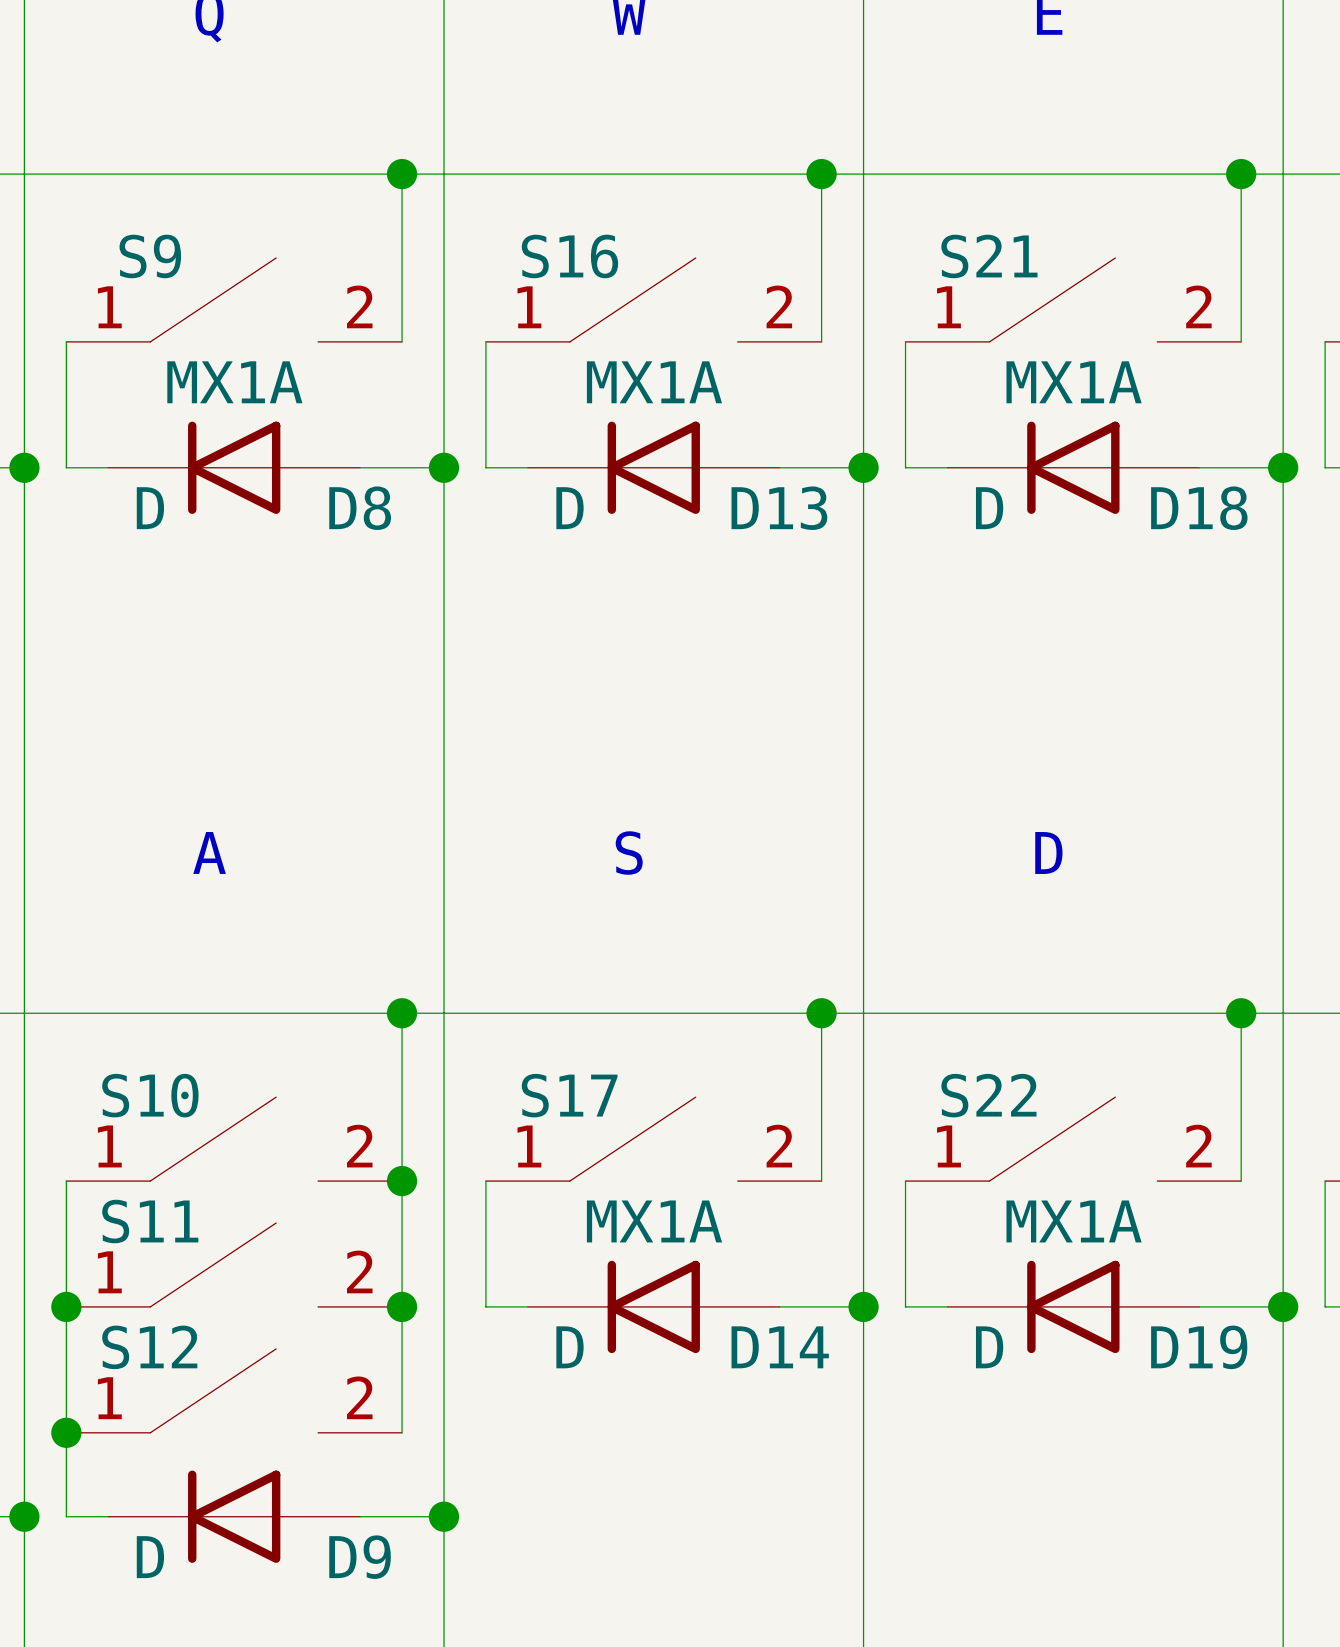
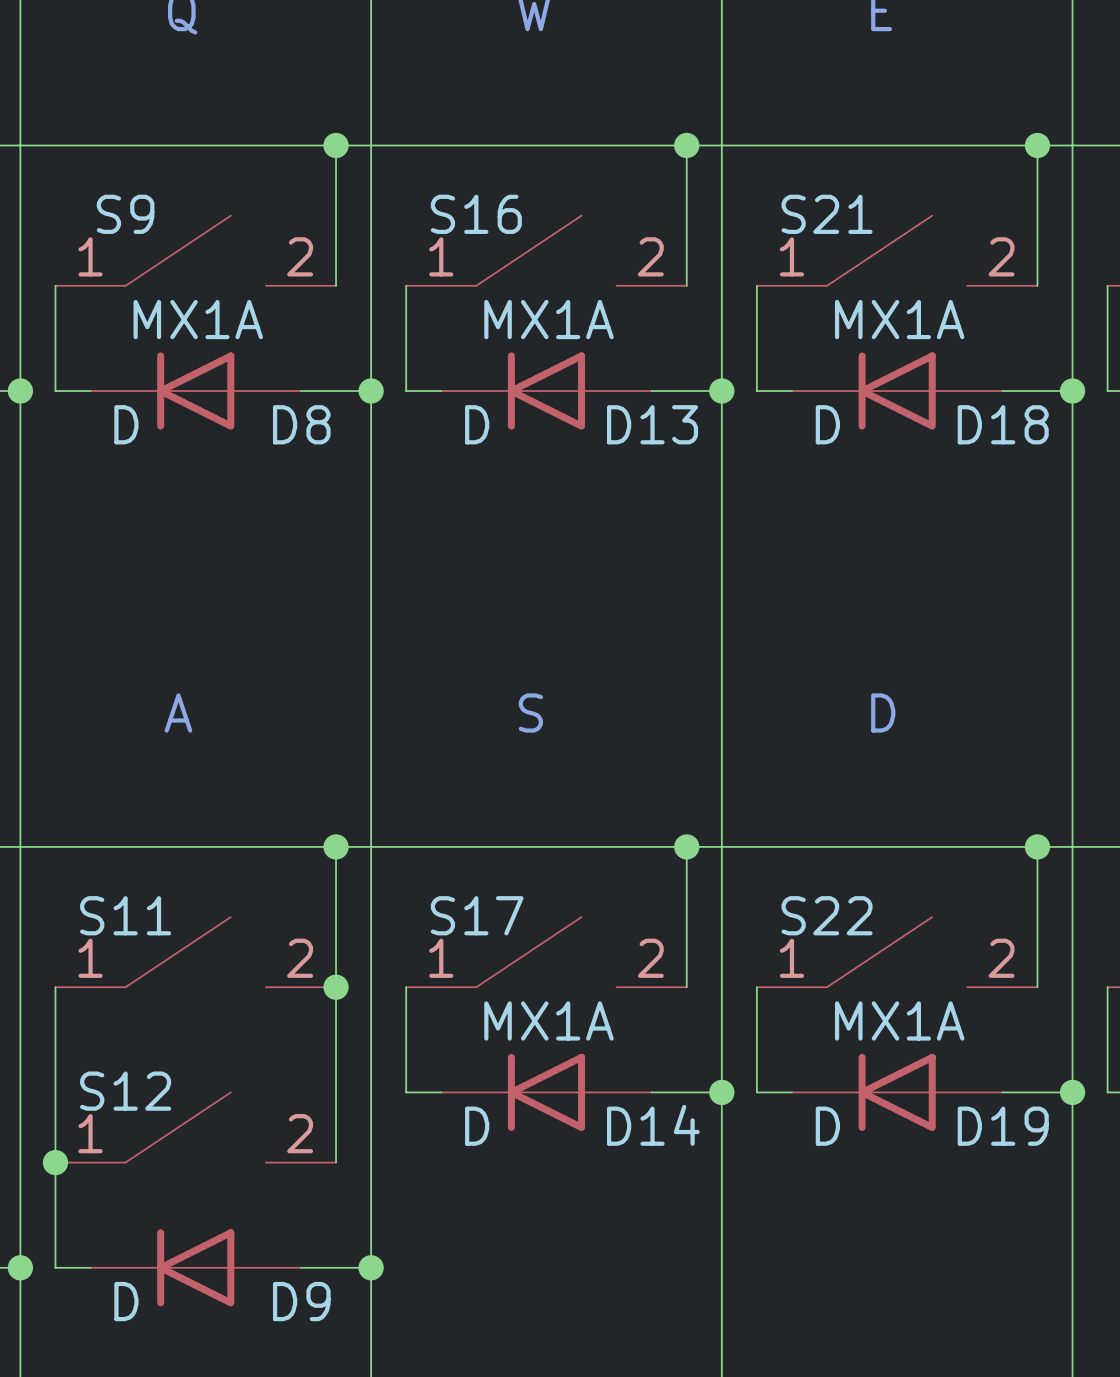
S10 name: S10 (150, 1095) -> S11 (125, 915)
S11: (234, 1264) -> none
junction: (66, 1306) -> none
junction: (402, 1306) -> none
junction: none -> (55, 1162)
S12 position: (234, 1390) -> (195, 1127)
wire: (402, 1390) (402, 1432) -> none
junction: (66, 1432) -> none

